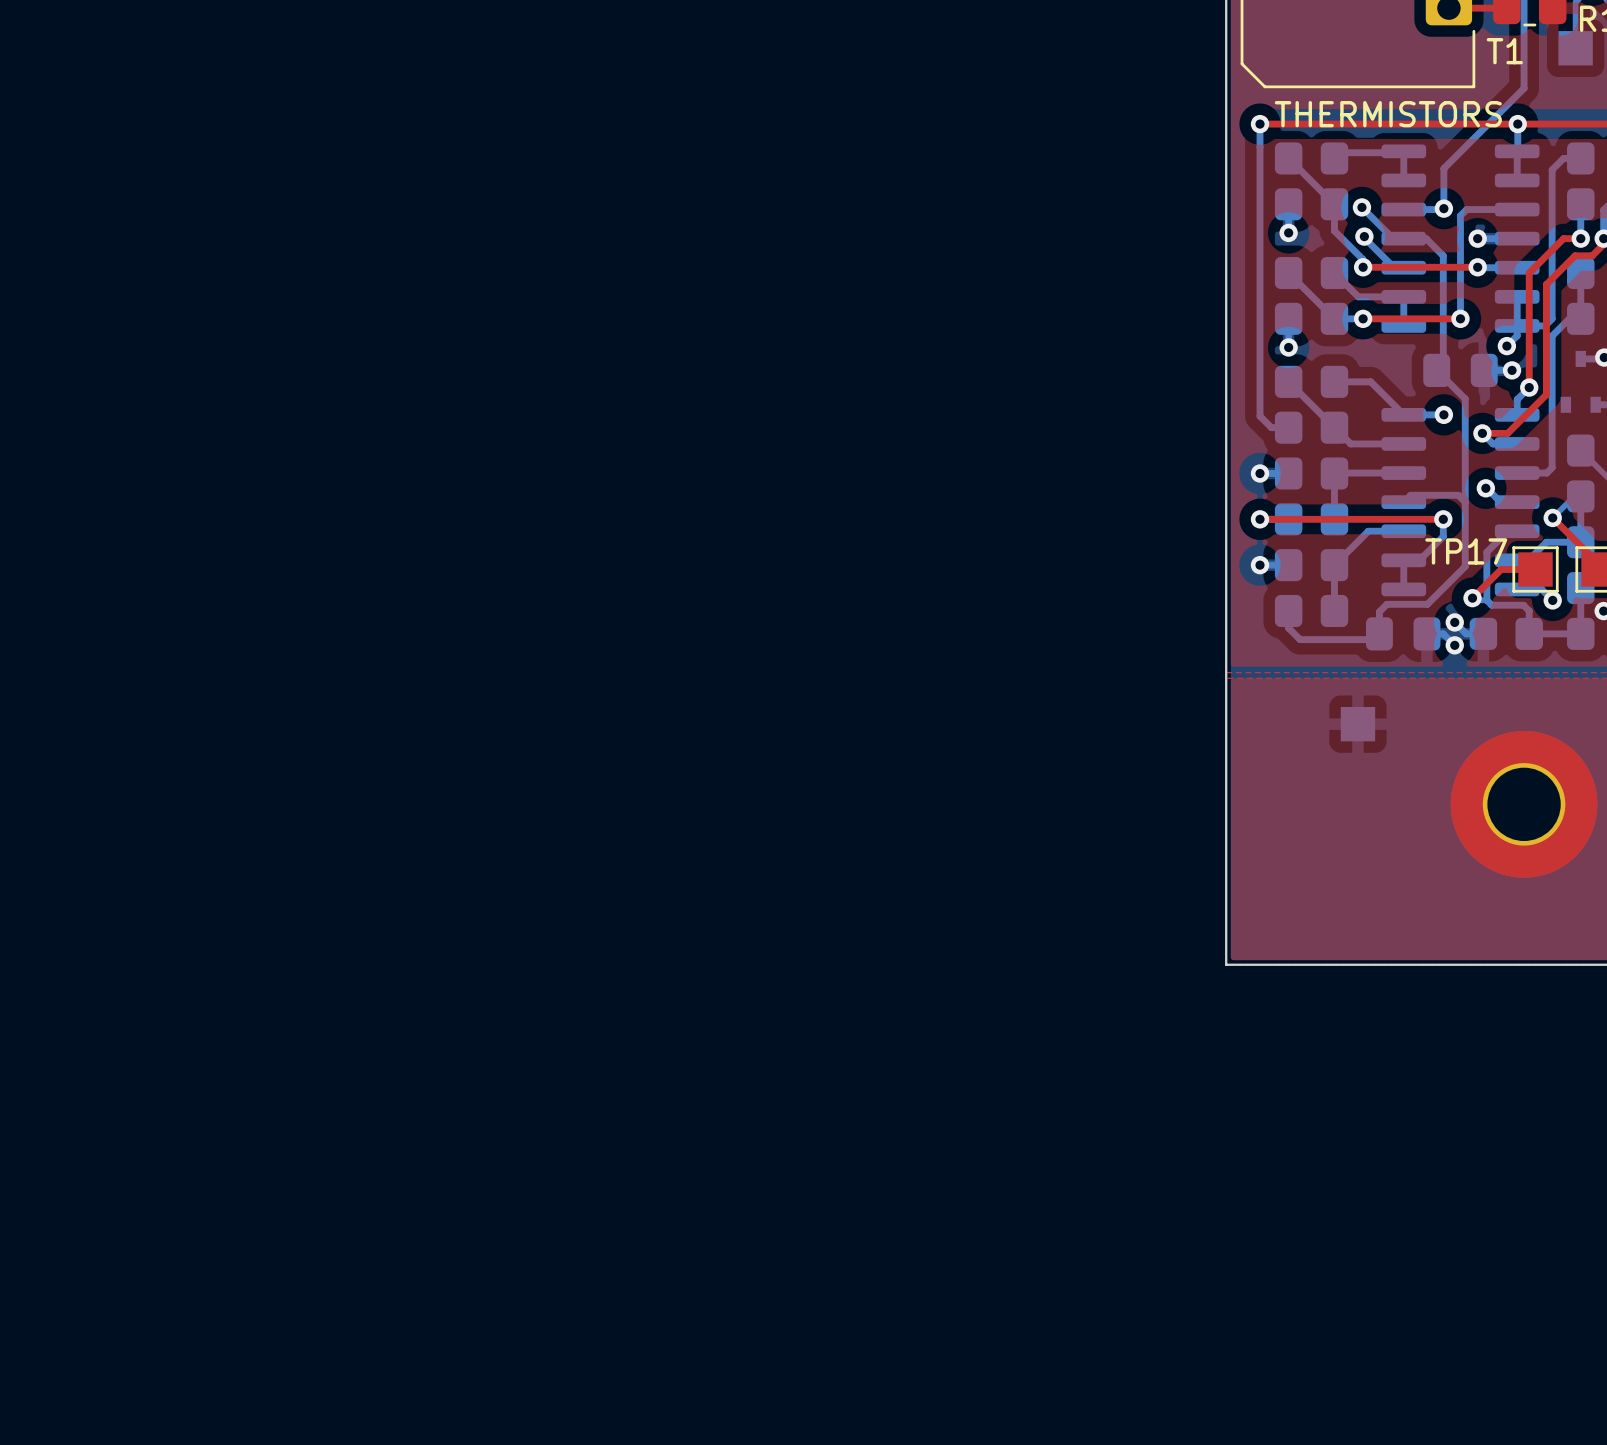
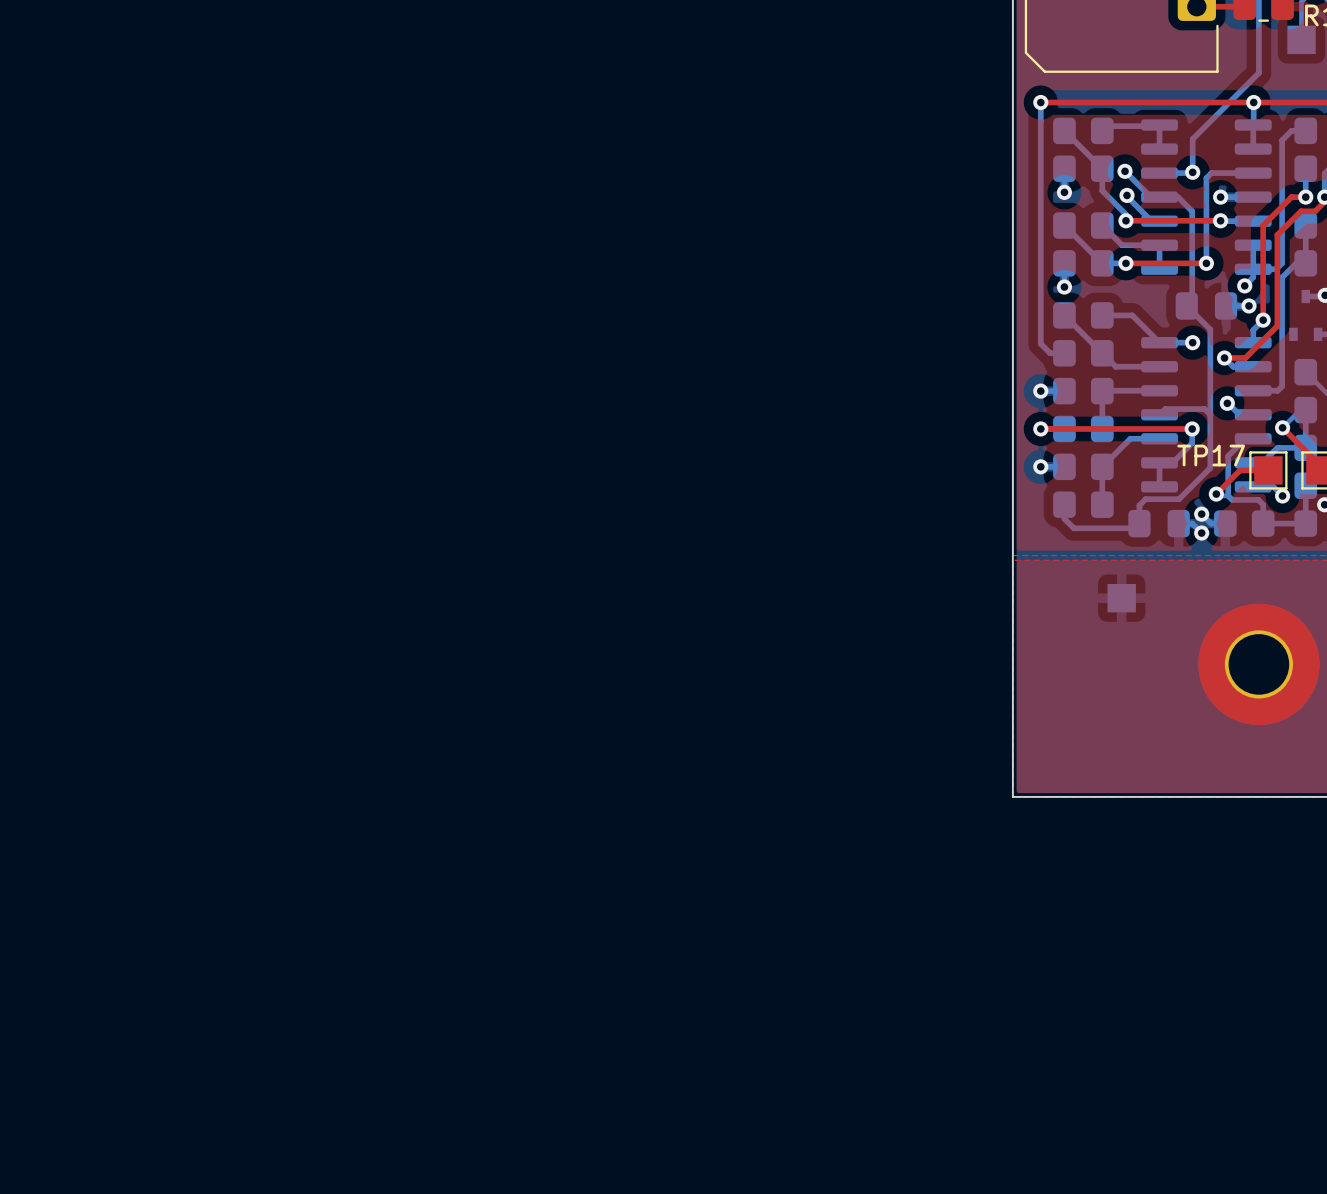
text: T1 (1504, 51) -> none
text: THERMISTORS (1388, 114) -> none

